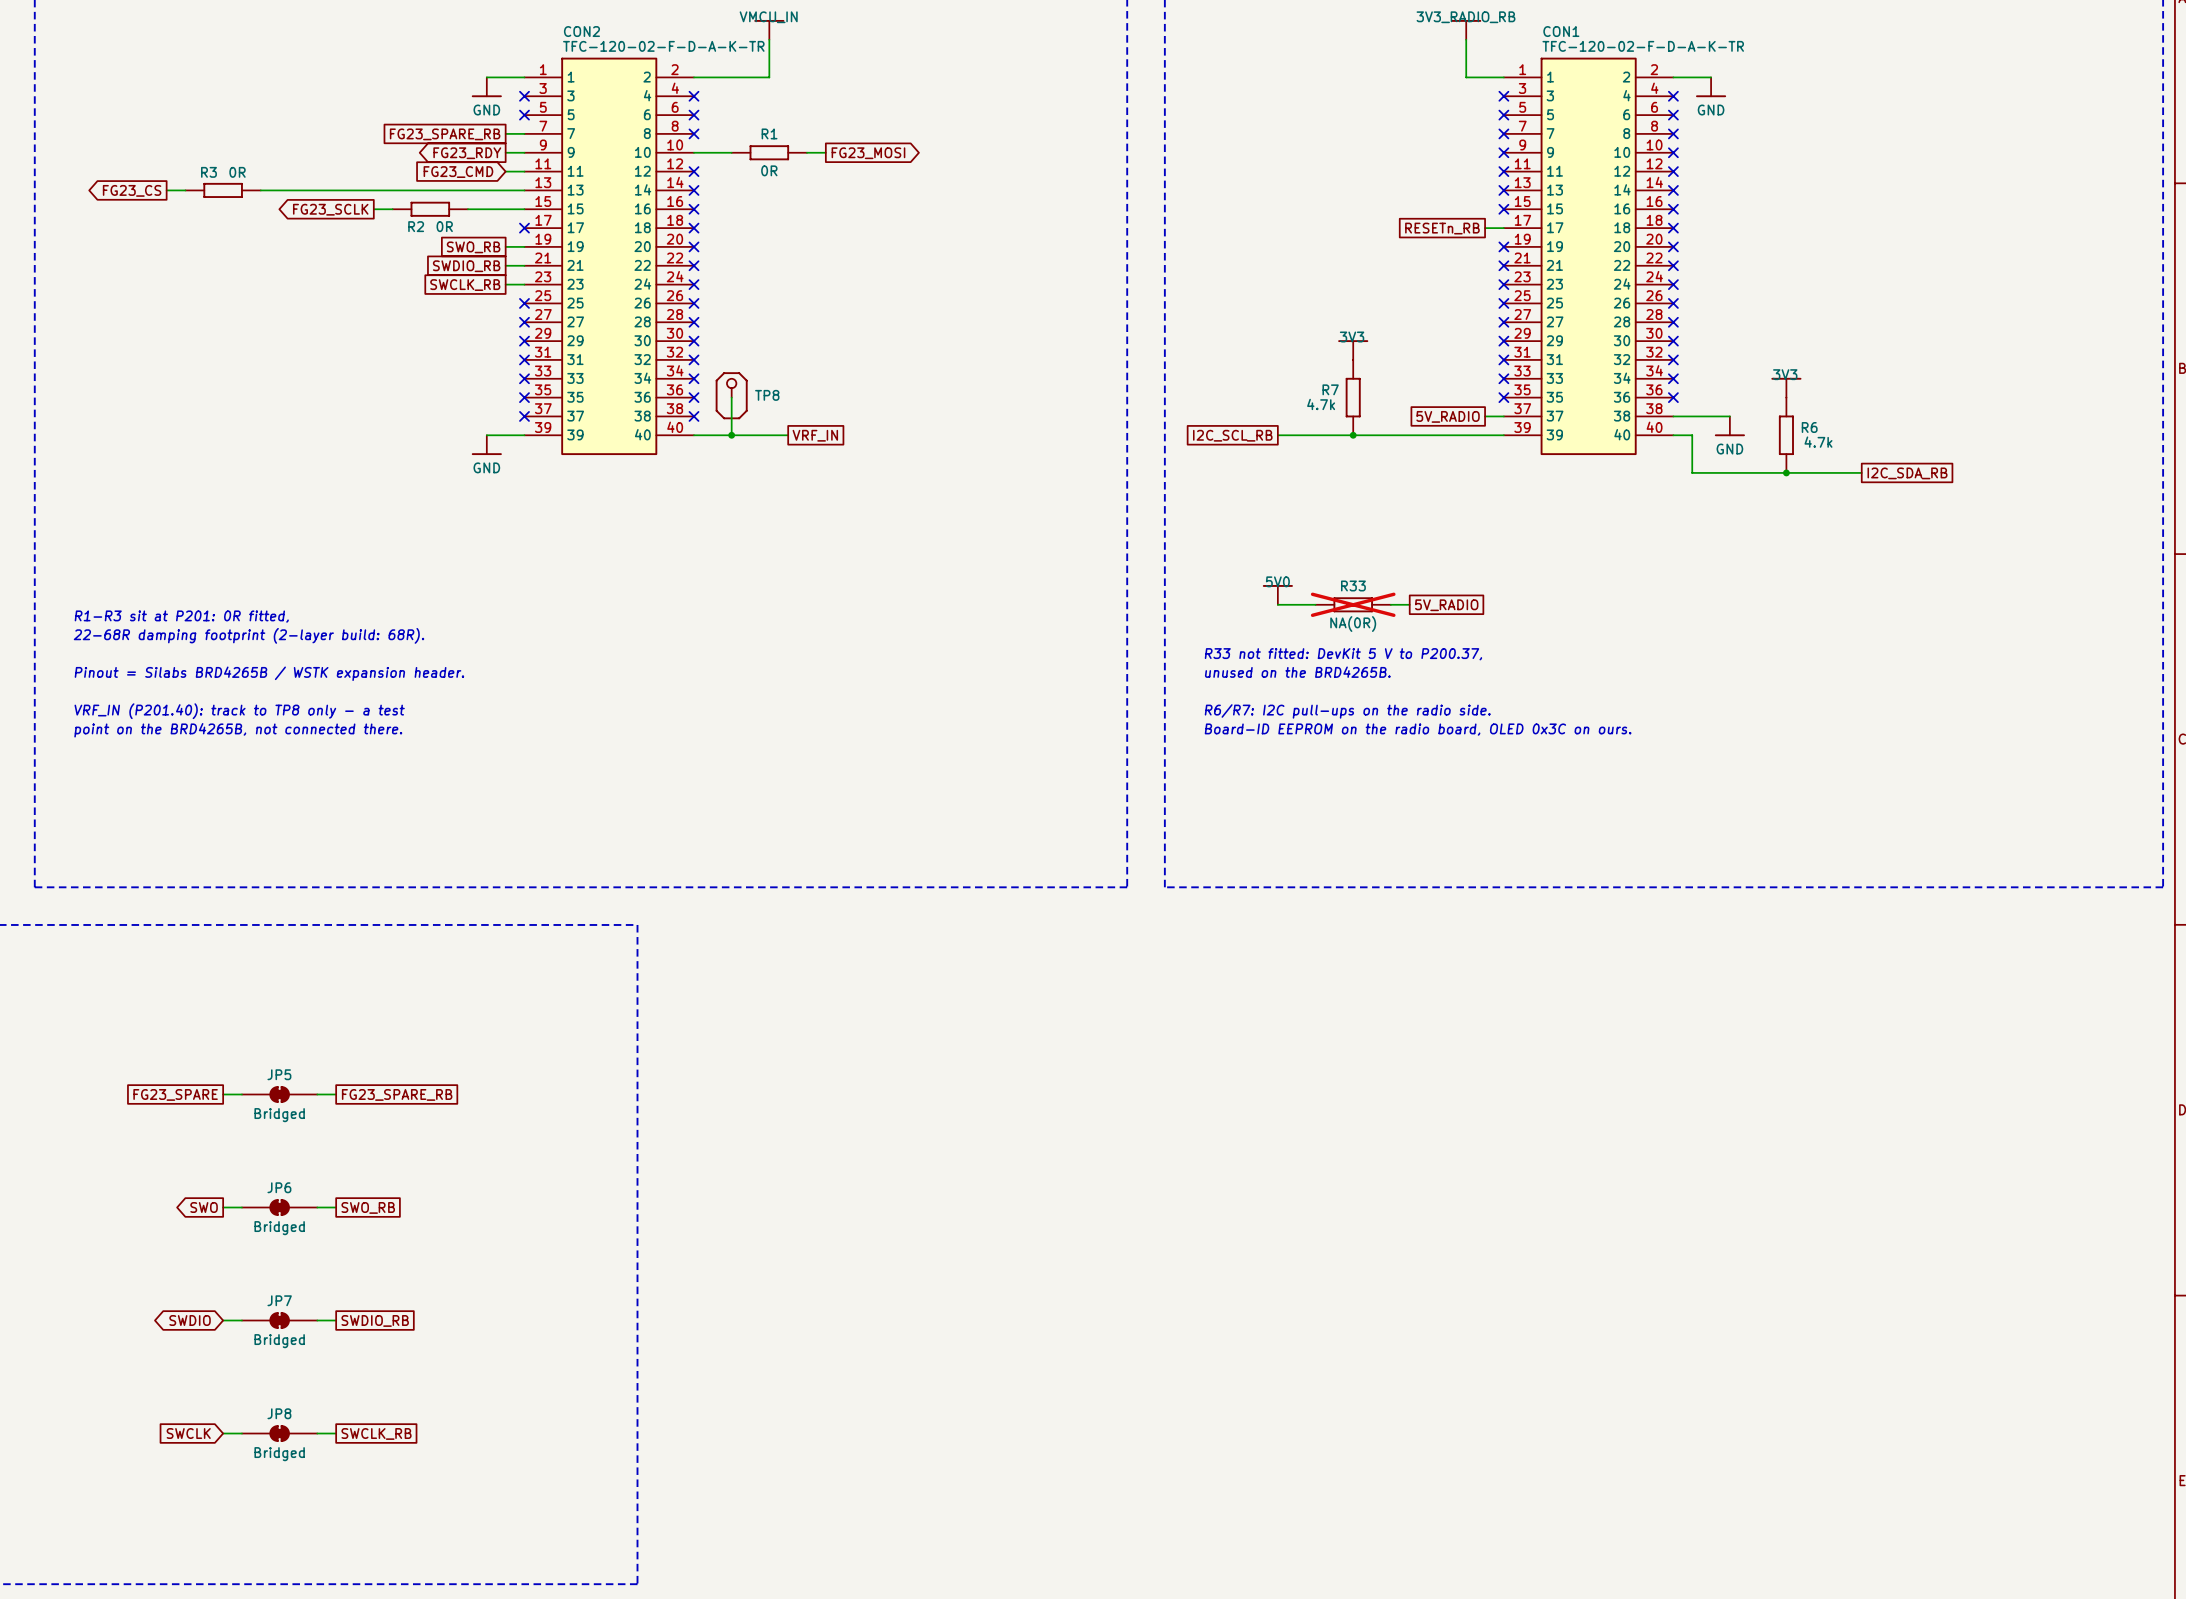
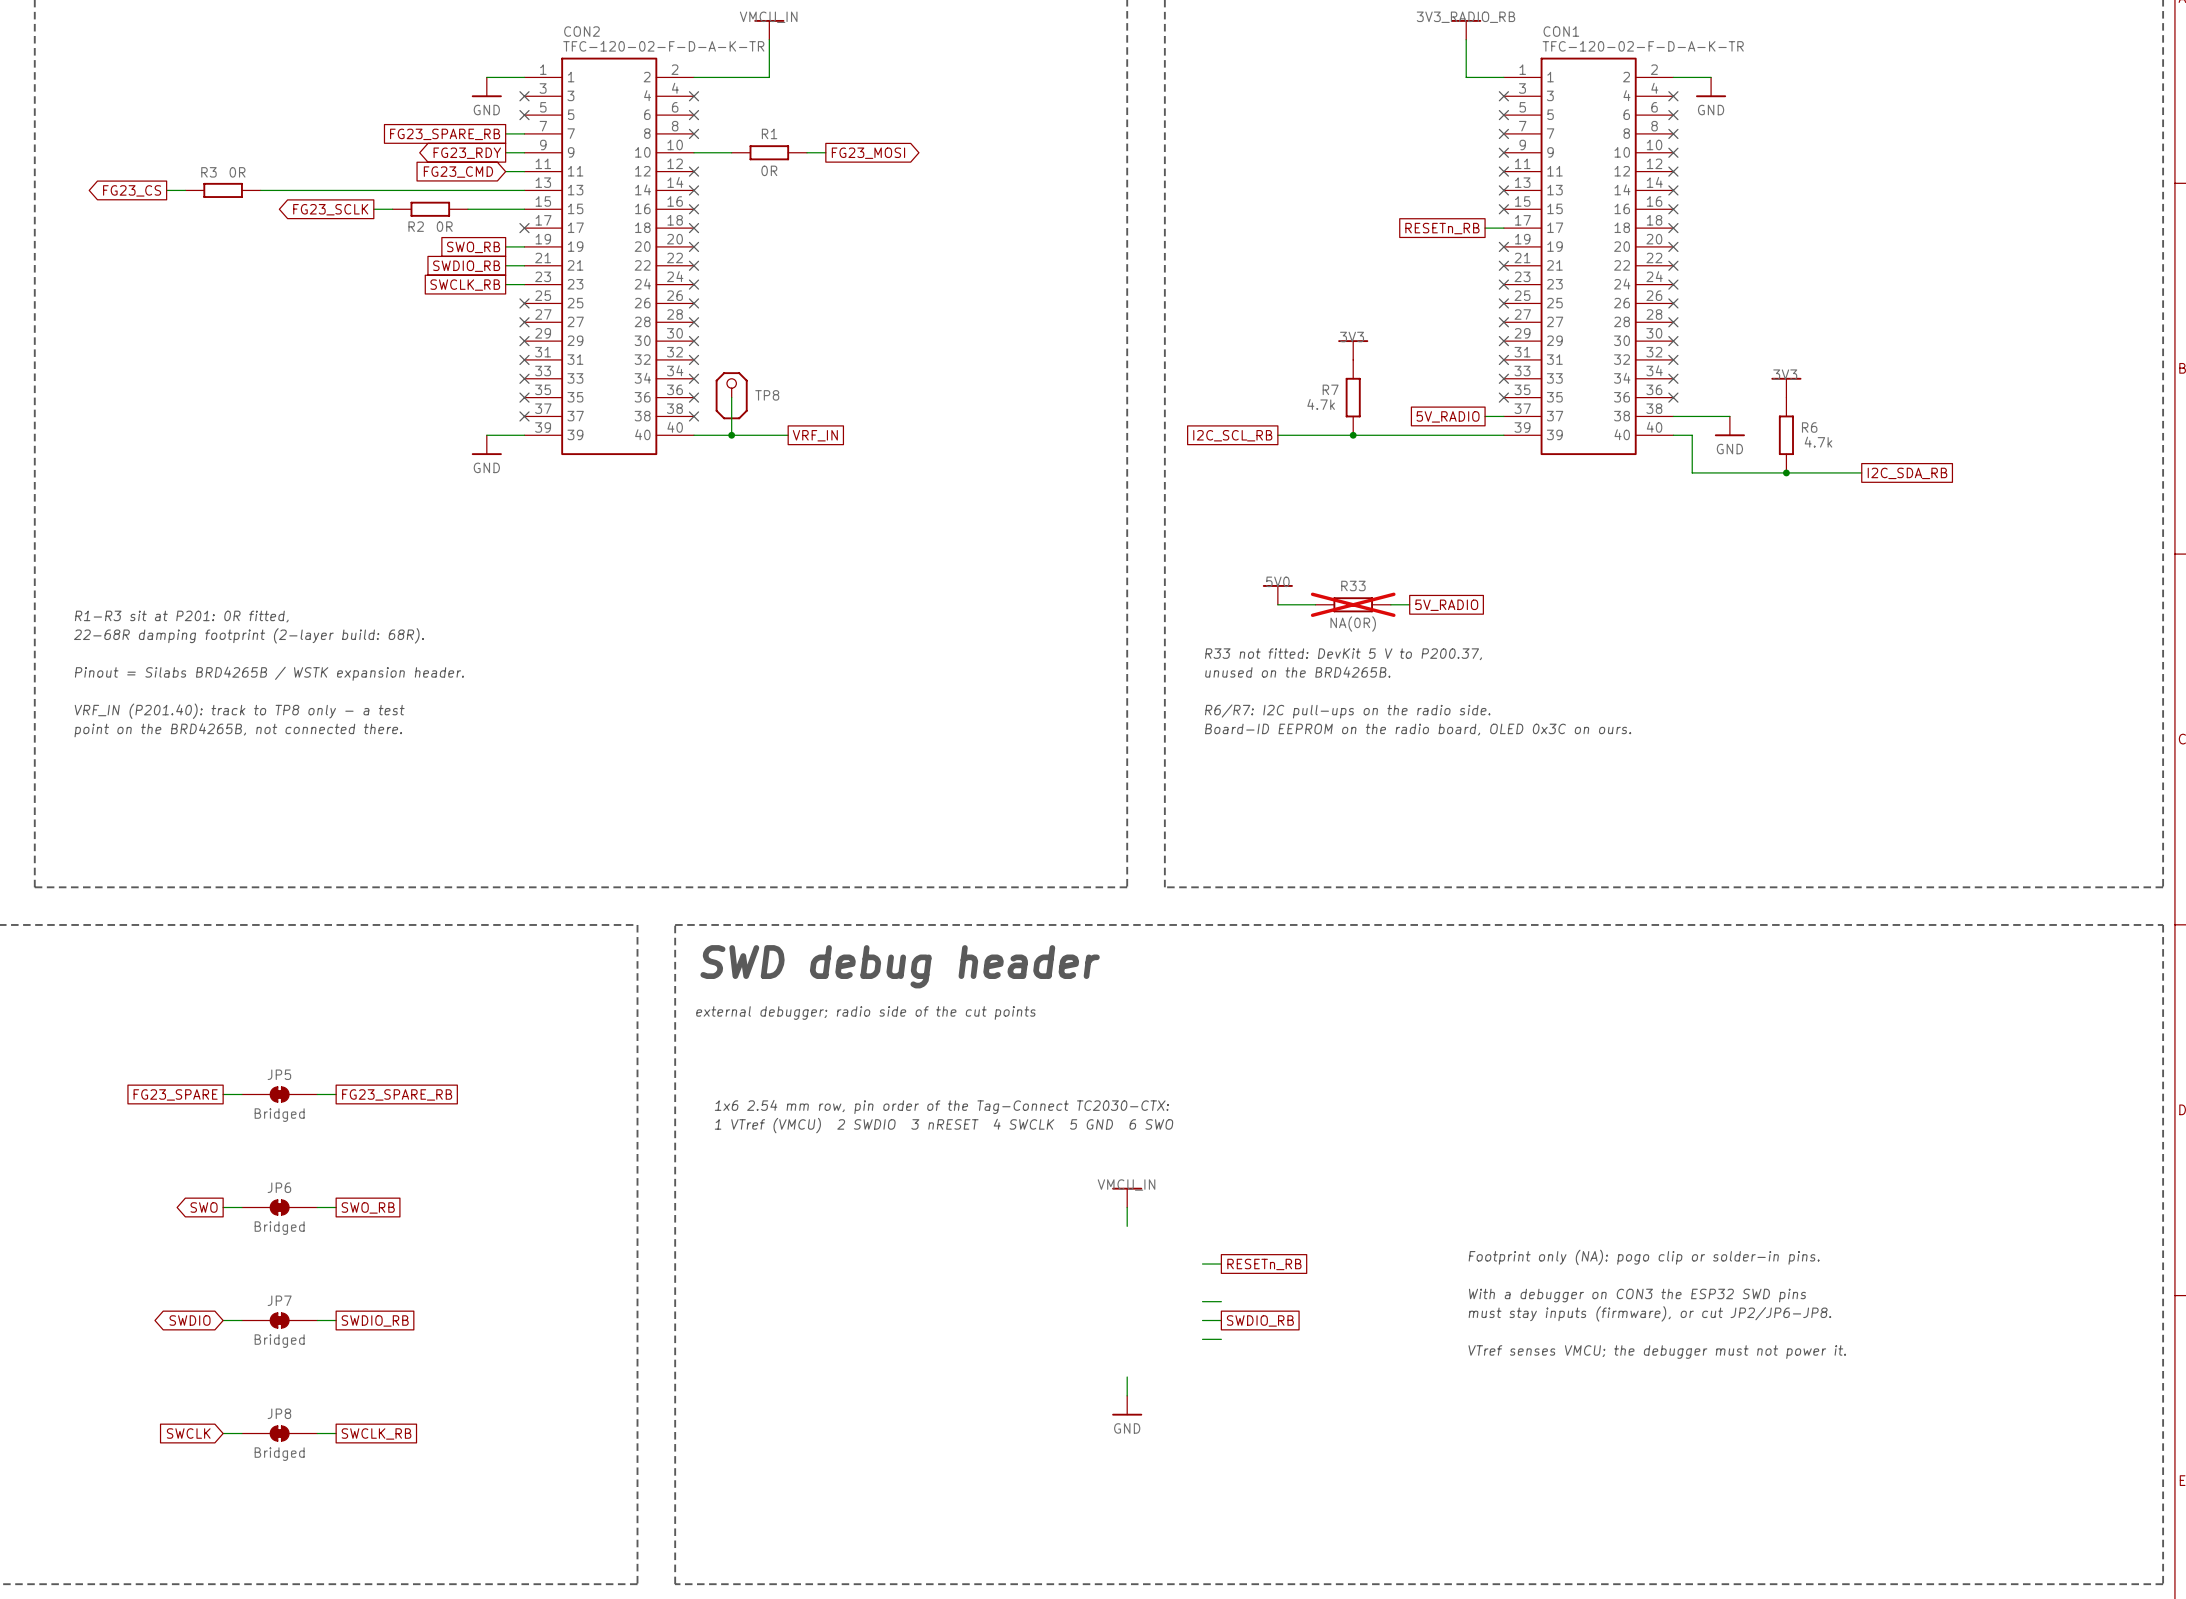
line: none -> (675, 924) (2163, 924) (2163, 1584) (675, 1584) (675, 924)
text: none -> SWD debug header (900, 966)
text: none -> external debugger; radio side of the cut points (865, 1013)
text: none -> 1x6 2.54 mm row, pin order of the Tag-Connect TC2030-CTX: (941, 1106)
text: none -> 1 VTref (VMCU) 2 SWDIO 3 nRESET 4 SWCLK 5 GND 6 SWO (944, 1125)
power symbol: none -> VMCU_IN (1127, 1197)
wire: none -> (1127, 1207) (1127, 1226)
text: none -> Footprint only (NA): pogo clip or solder-in pins. (1644, 1257)
wire: none -> (1202, 1264) (1221, 1264)
global label: none -> RESETn_RB (1264, 1264)
text: none -> With a debugger on CON3 the ESP32 SWD pins (1637, 1295)
wire: none -> (1202, 1301) (1221, 1301)
text: none -> must stay inputs (firmware), or cut JP2/JP6-JP8. (1649, 1313)
wire: none -> (1202, 1320) (1221, 1320)
global label: none -> SWDIO_RB (1260, 1320)
wire: none -> (1202, 1339) (1221, 1339)
text: none -> VTref senses VMCU; the debugger must not power it. (1657, 1352)
wire: none -> (1127, 1377) (1127, 1395)
power symbol: none -> GND (1127, 1405)

